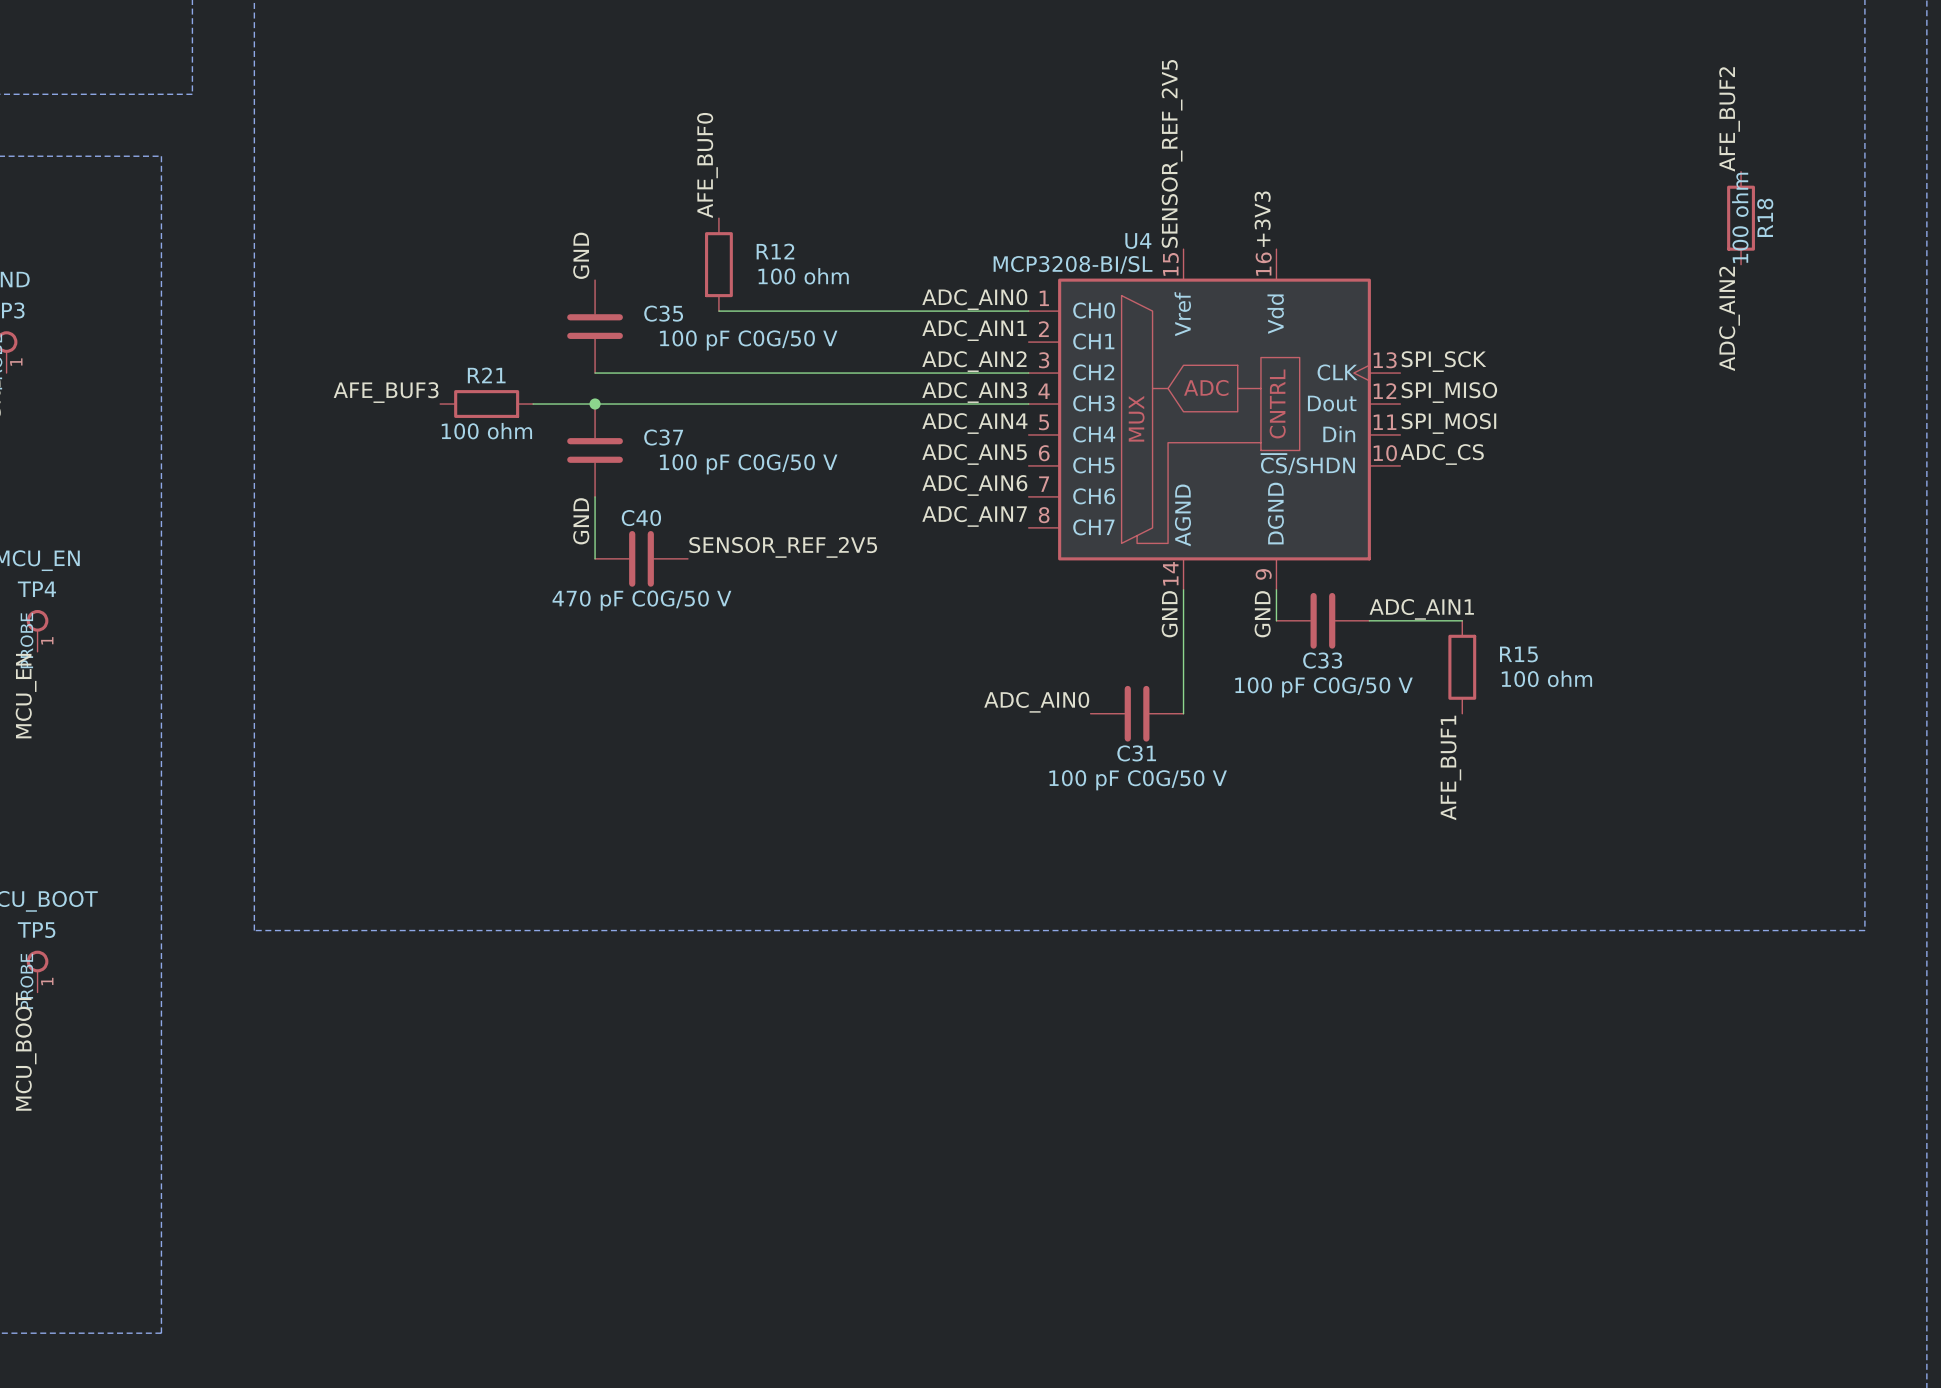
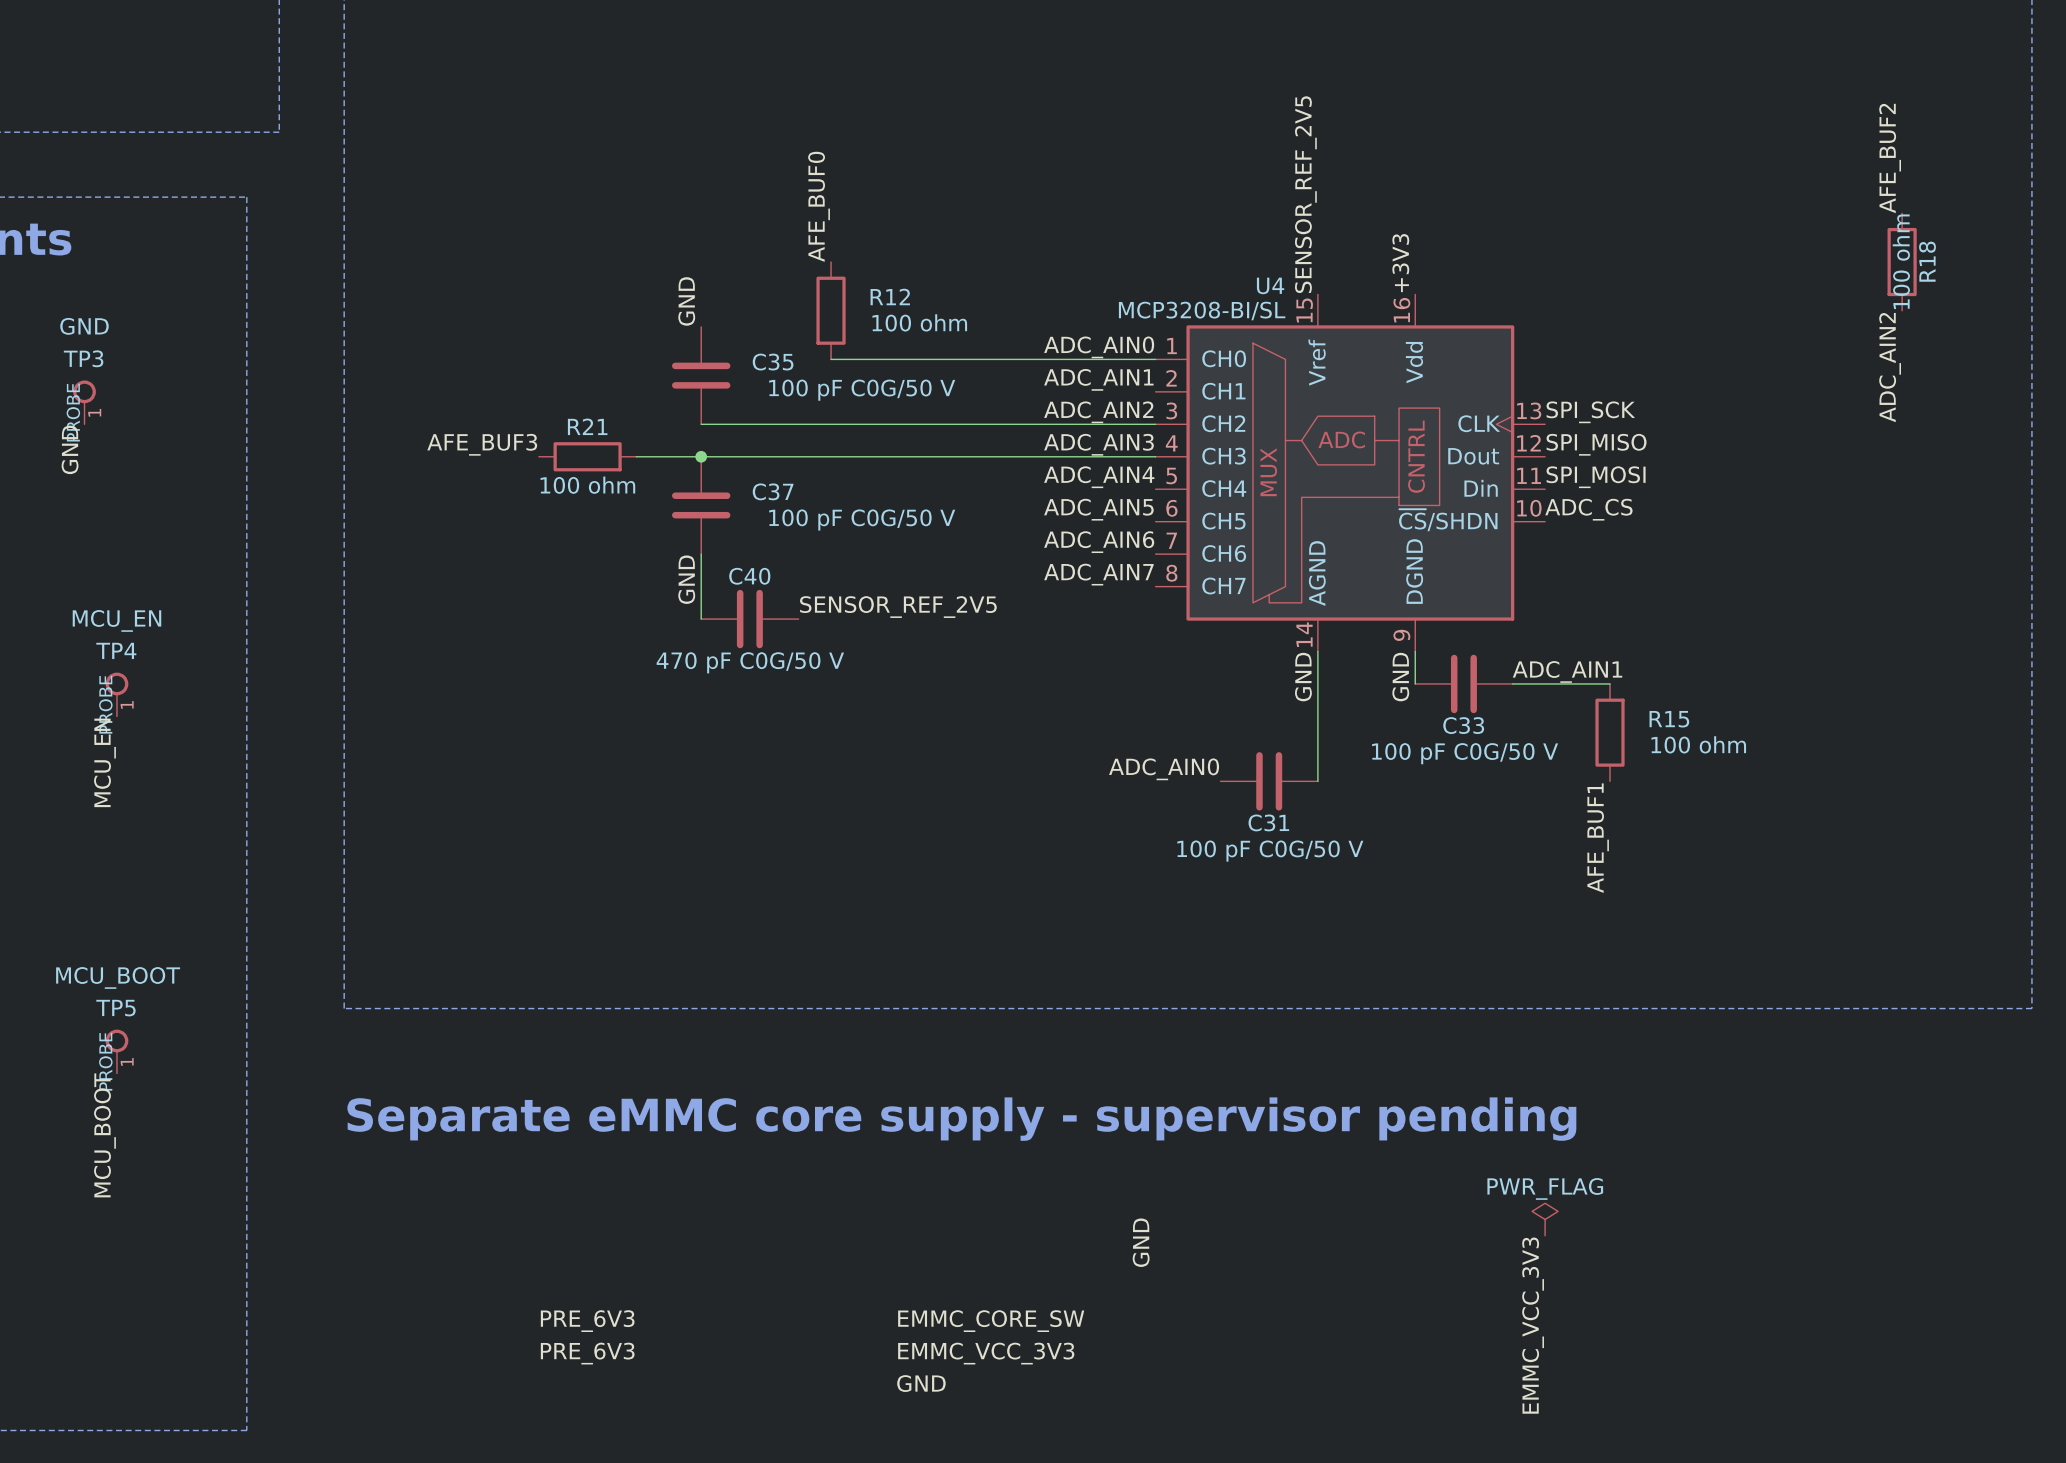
text: none -> Separate eMMC core supply - supervisor pending (961, 1119)
power symbol: none -> PWR_FLAG (1545, 1219)
label: none -> GND (1141, 1242)
label: none -> PRE_6V3 (587, 1321)
label: none -> EMMC_CORE_SW (991, 1321)
label: none -> EMMC_VCC_3V3 (1533, 1325)
label: none -> PRE_6V3 (587, 1353)
label: none -> EMMC_VCC_3V3 (986, 1353)
label: none -> GND (921, 1383)

